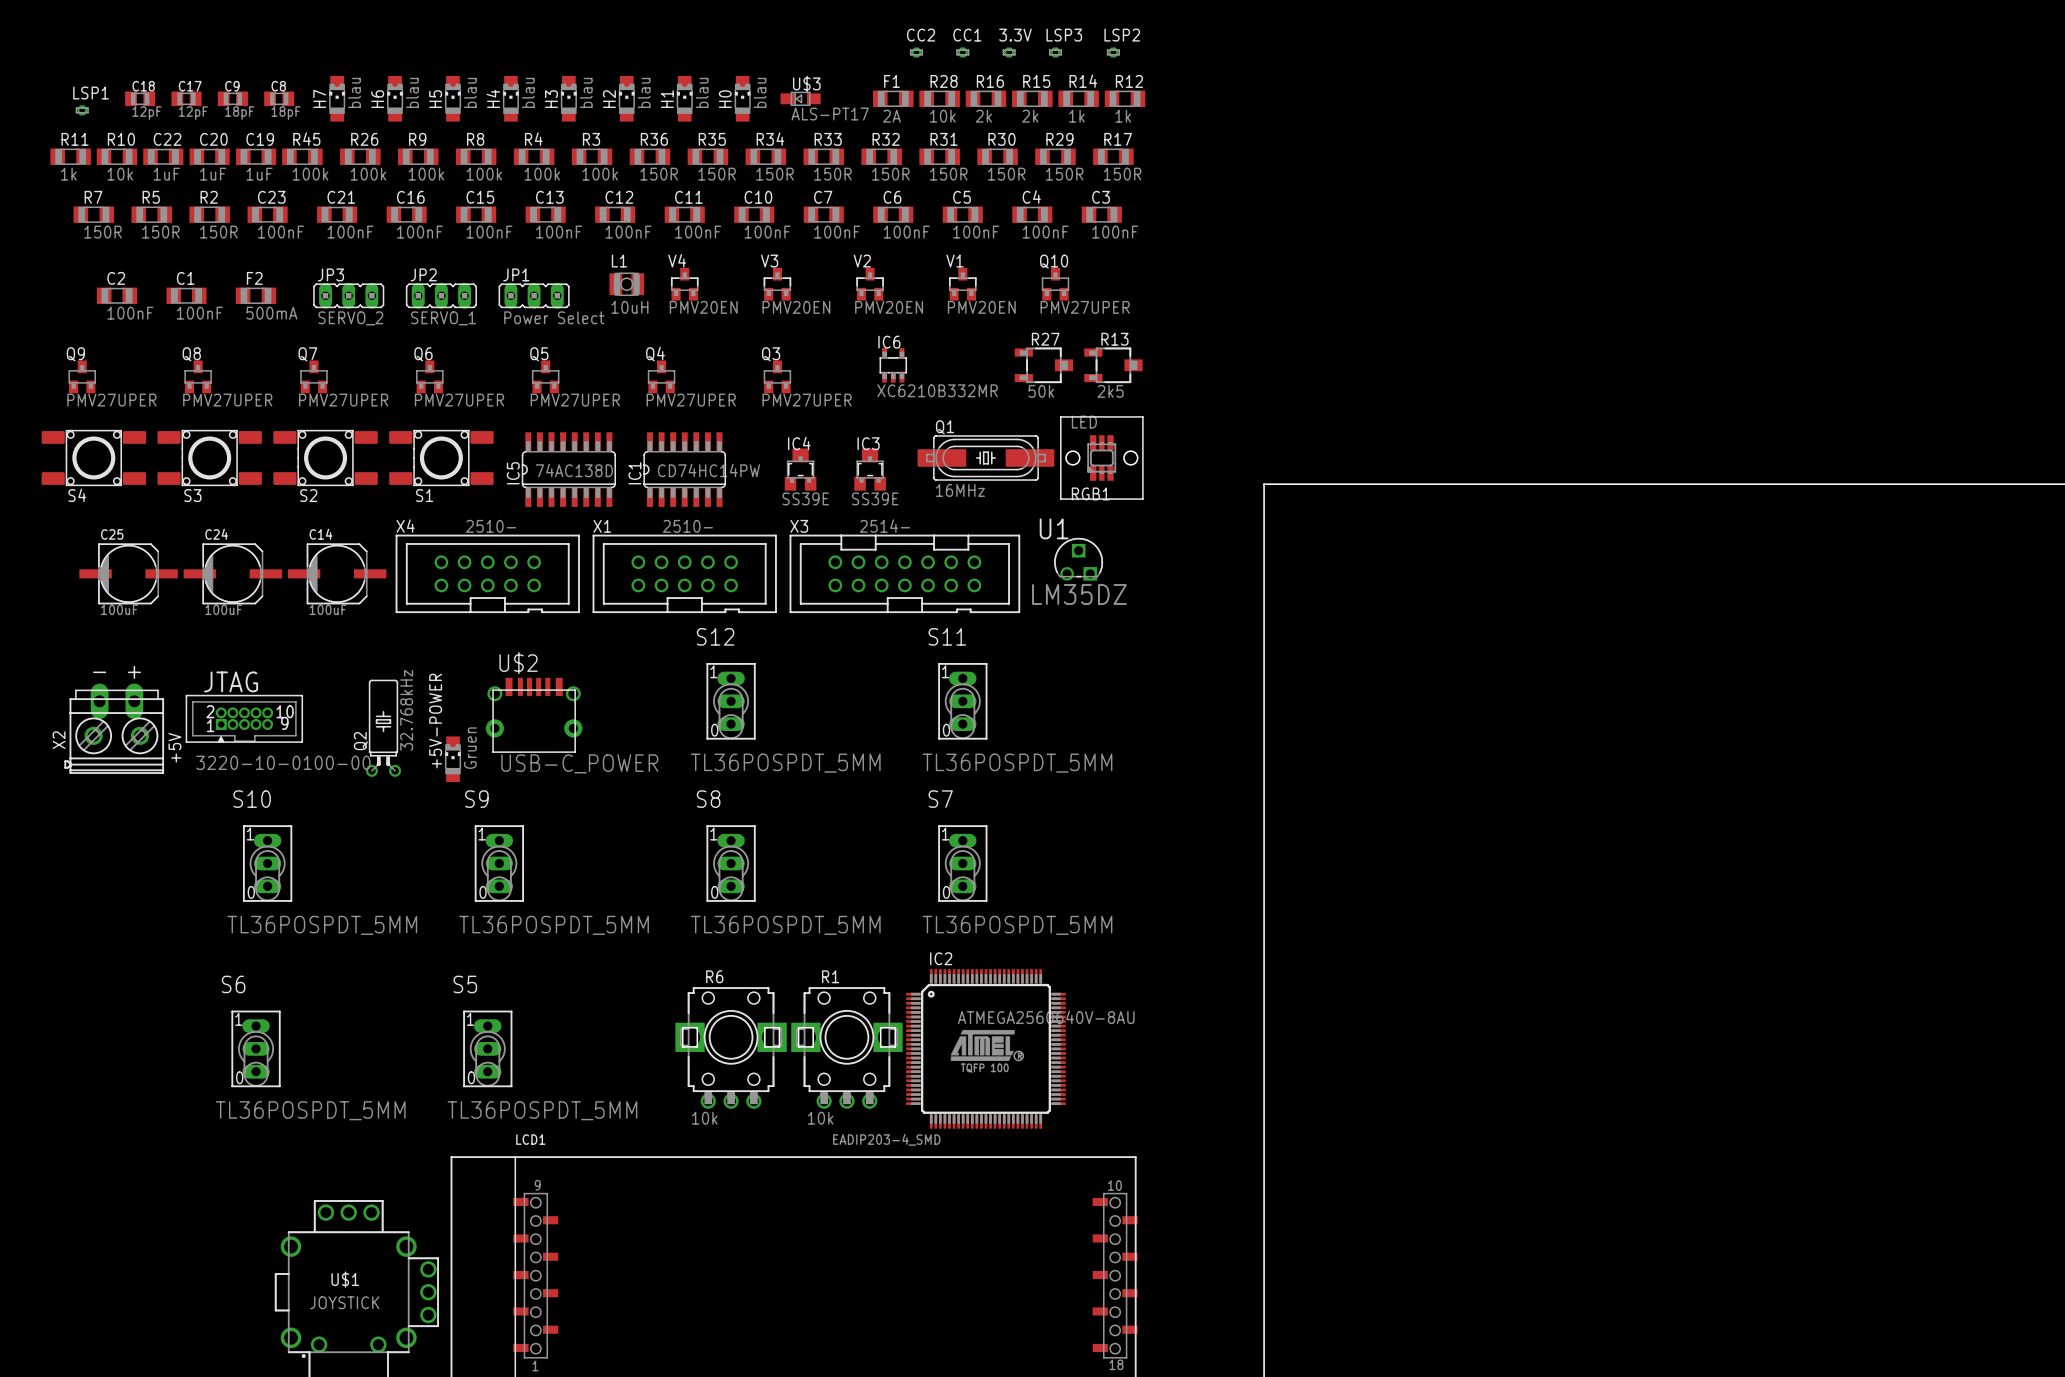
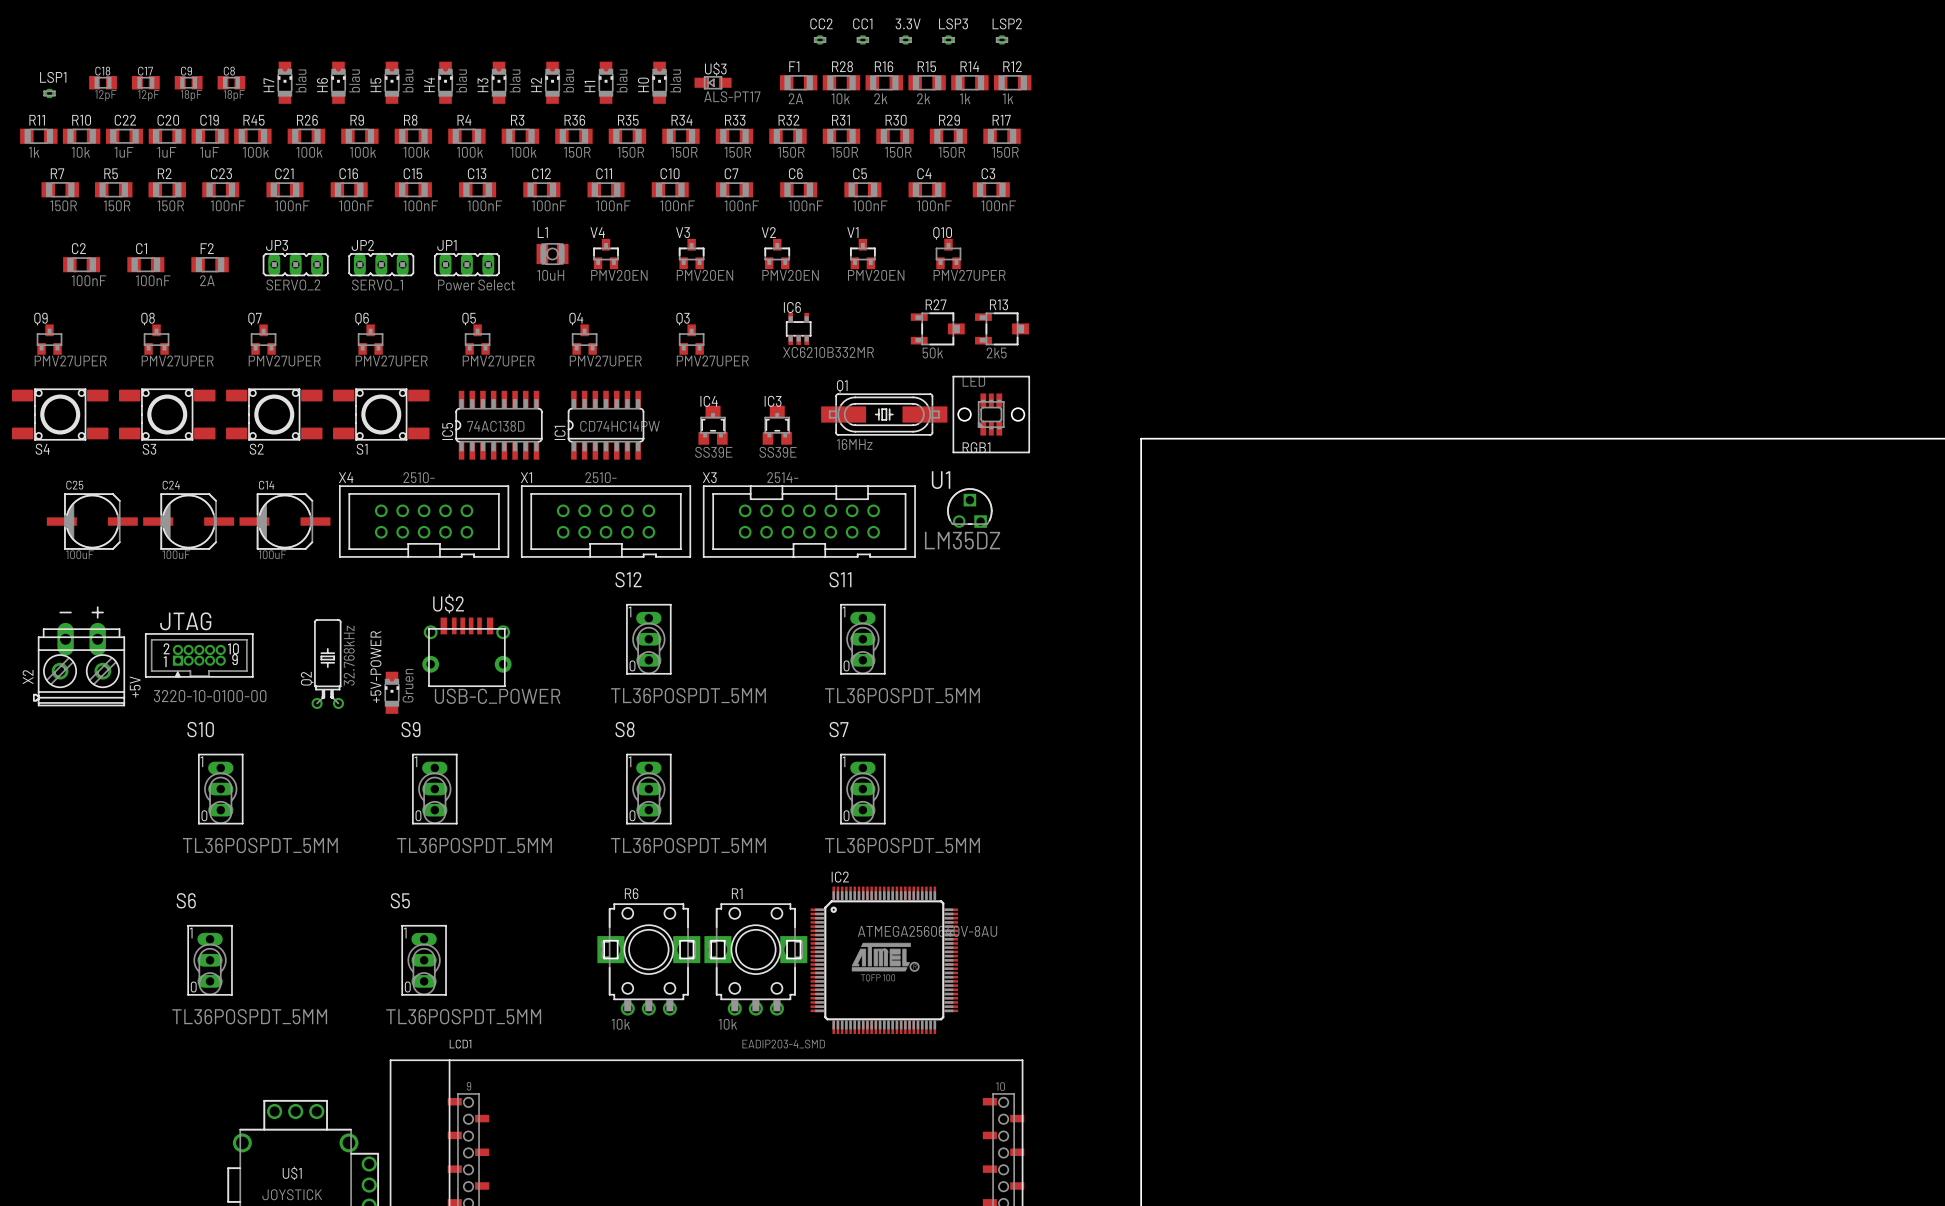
F2 value: 500mA (271, 313) -> 2A (207, 280)

